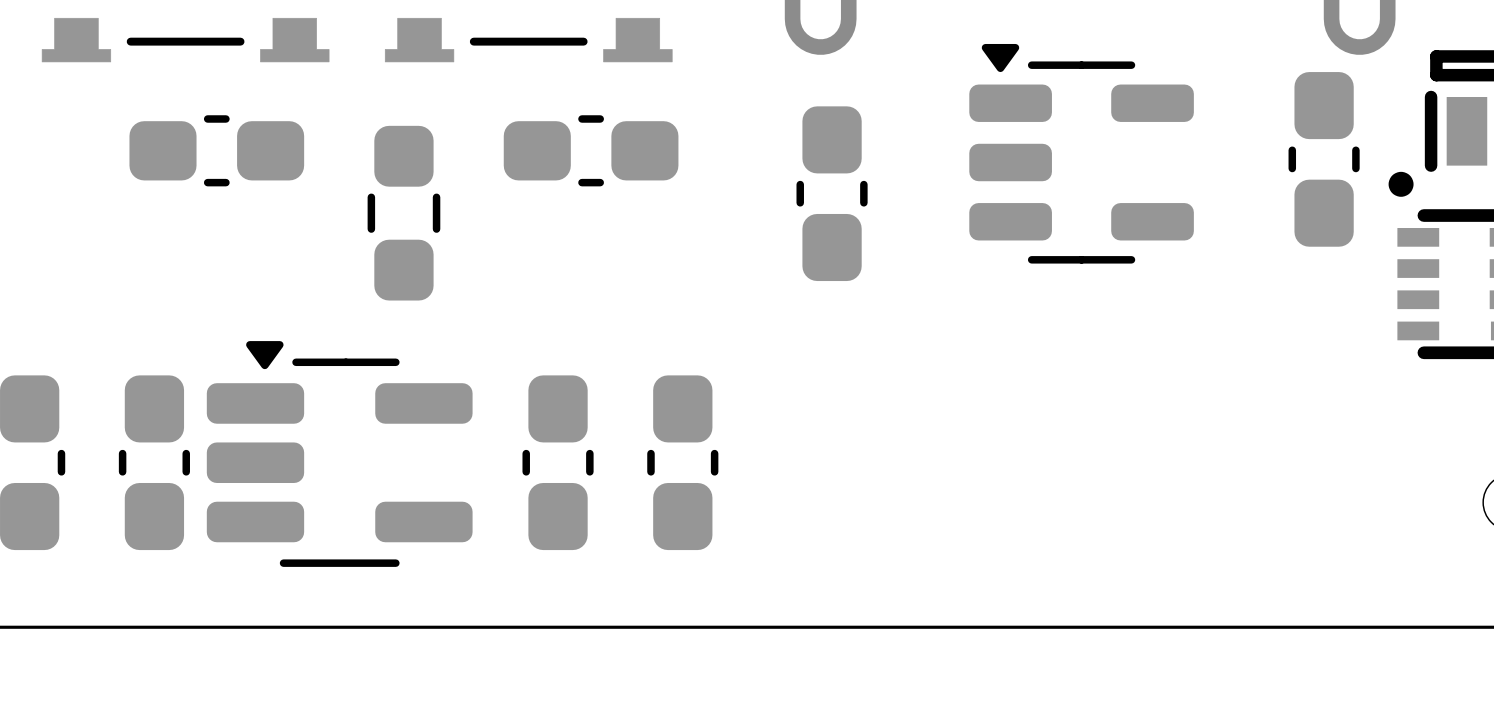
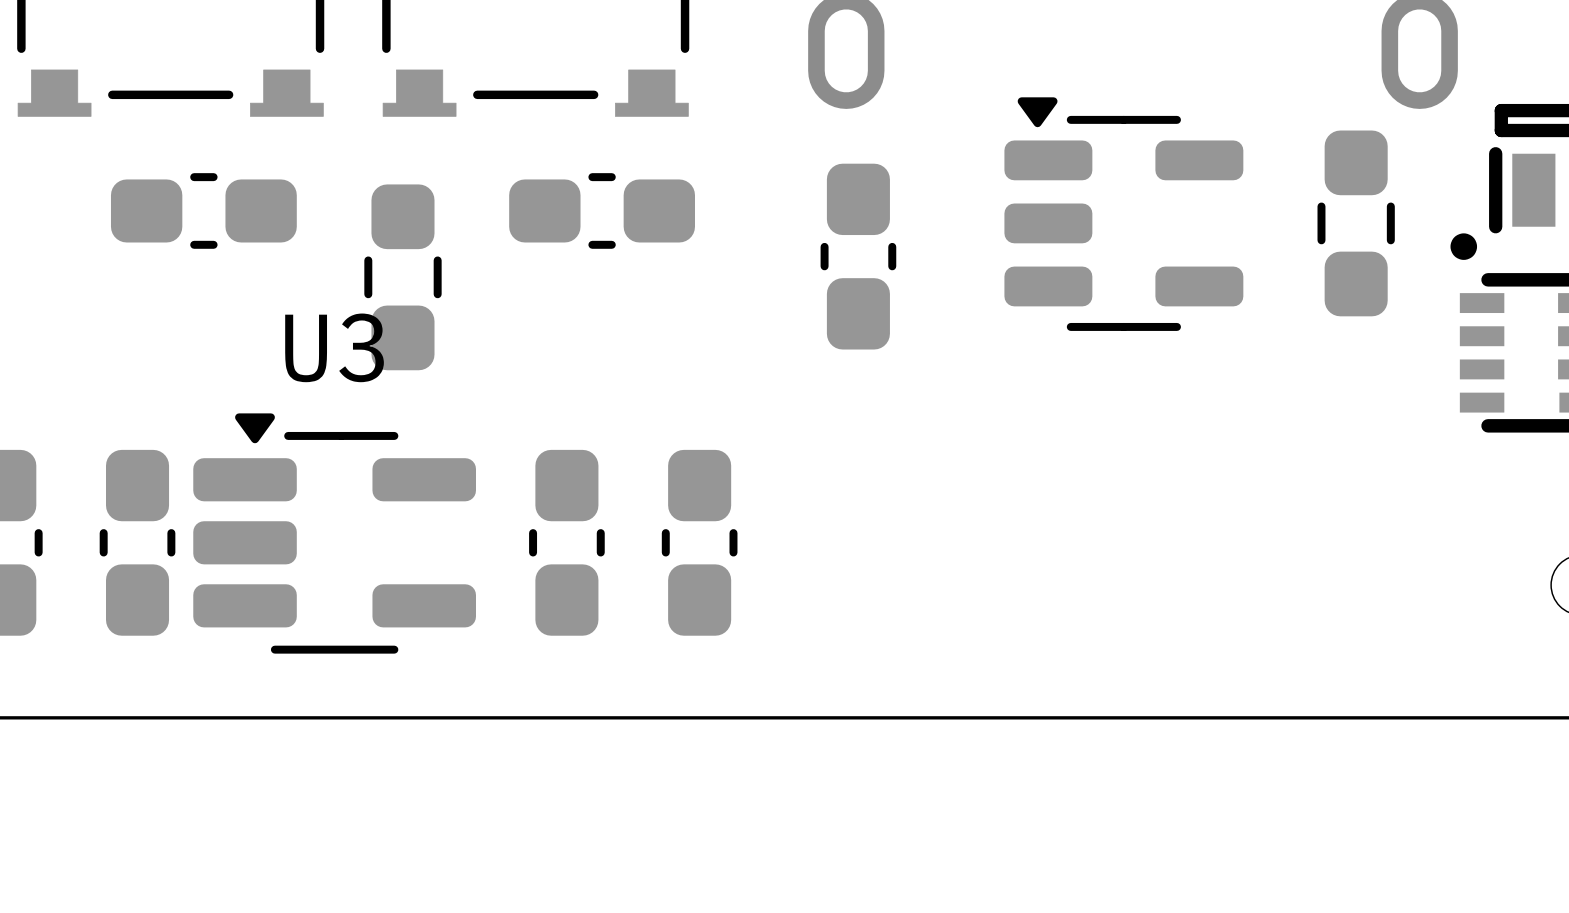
part footprint: [1288, 72, 1360, 247] -> [1317, 130, 1395, 317]
U3 name: none -> U3 (334, 347)

